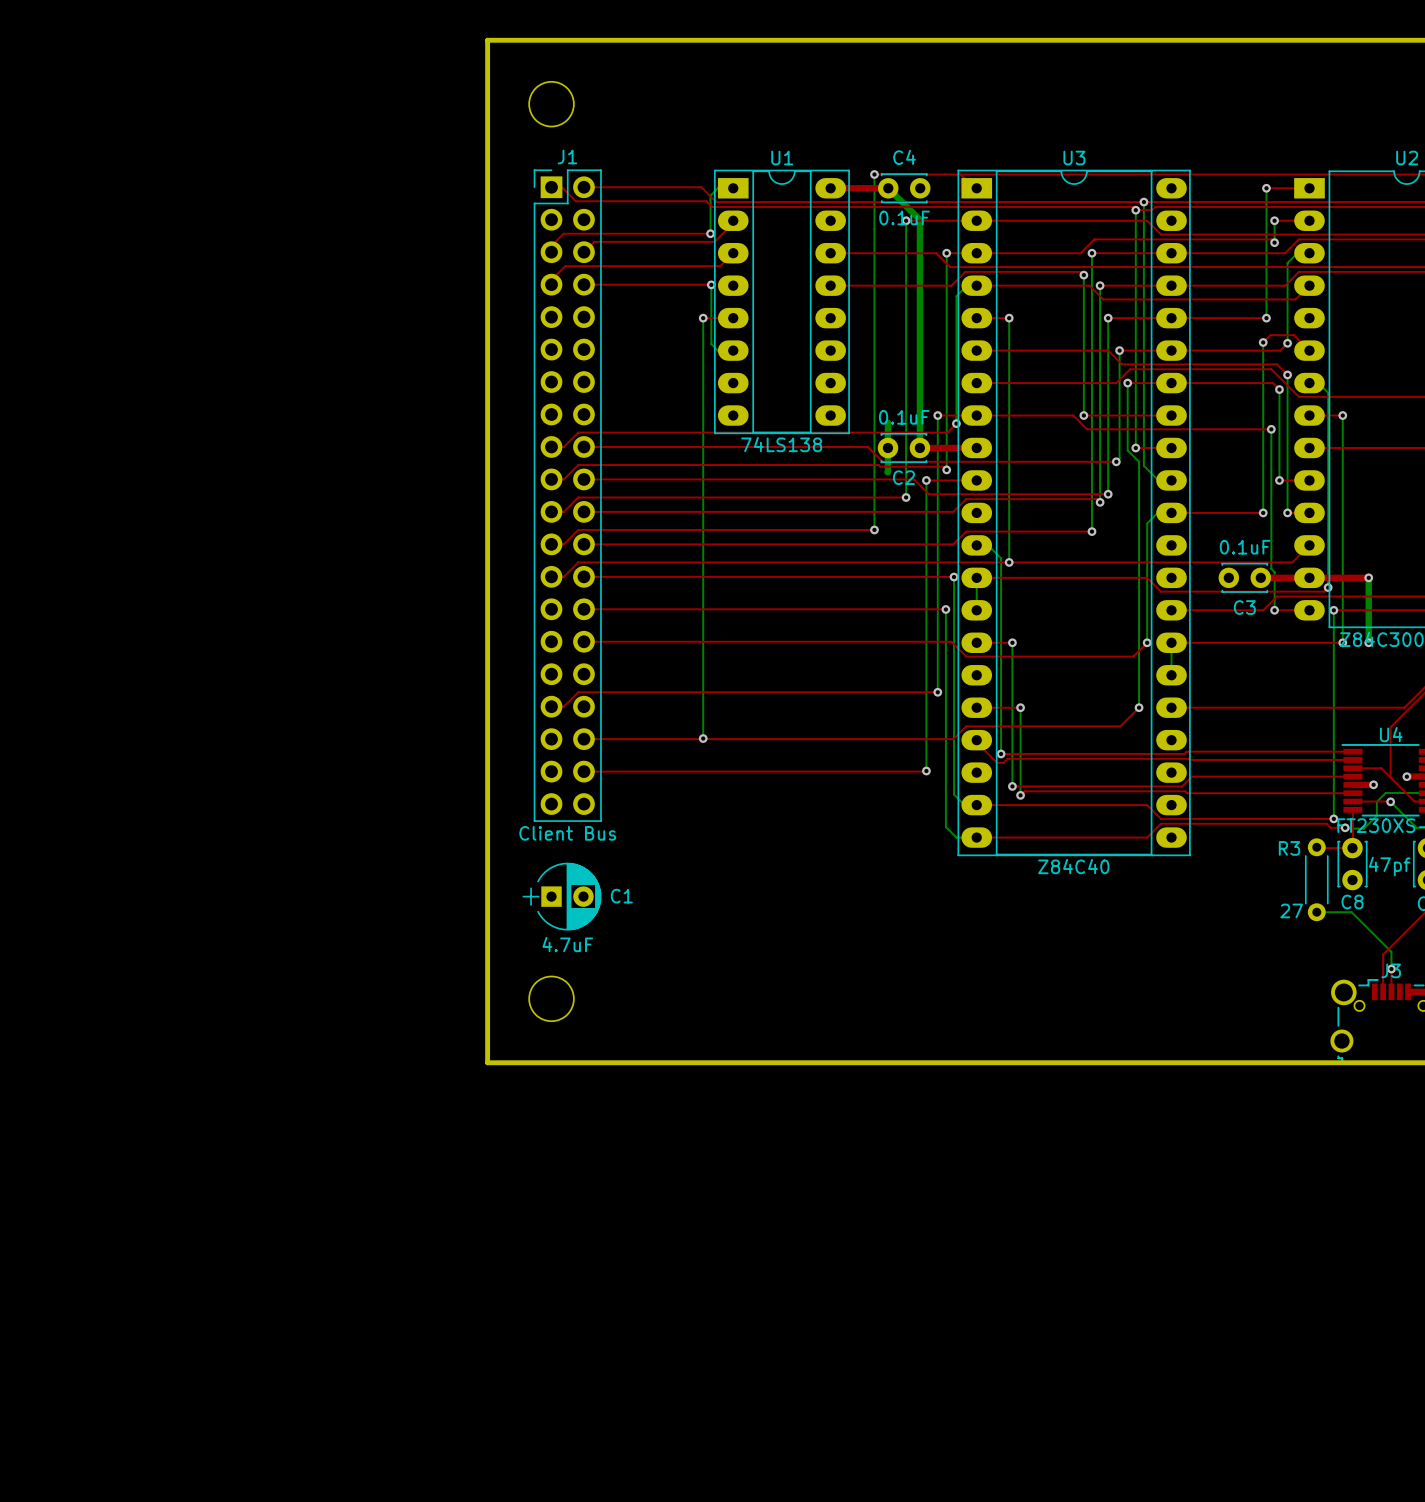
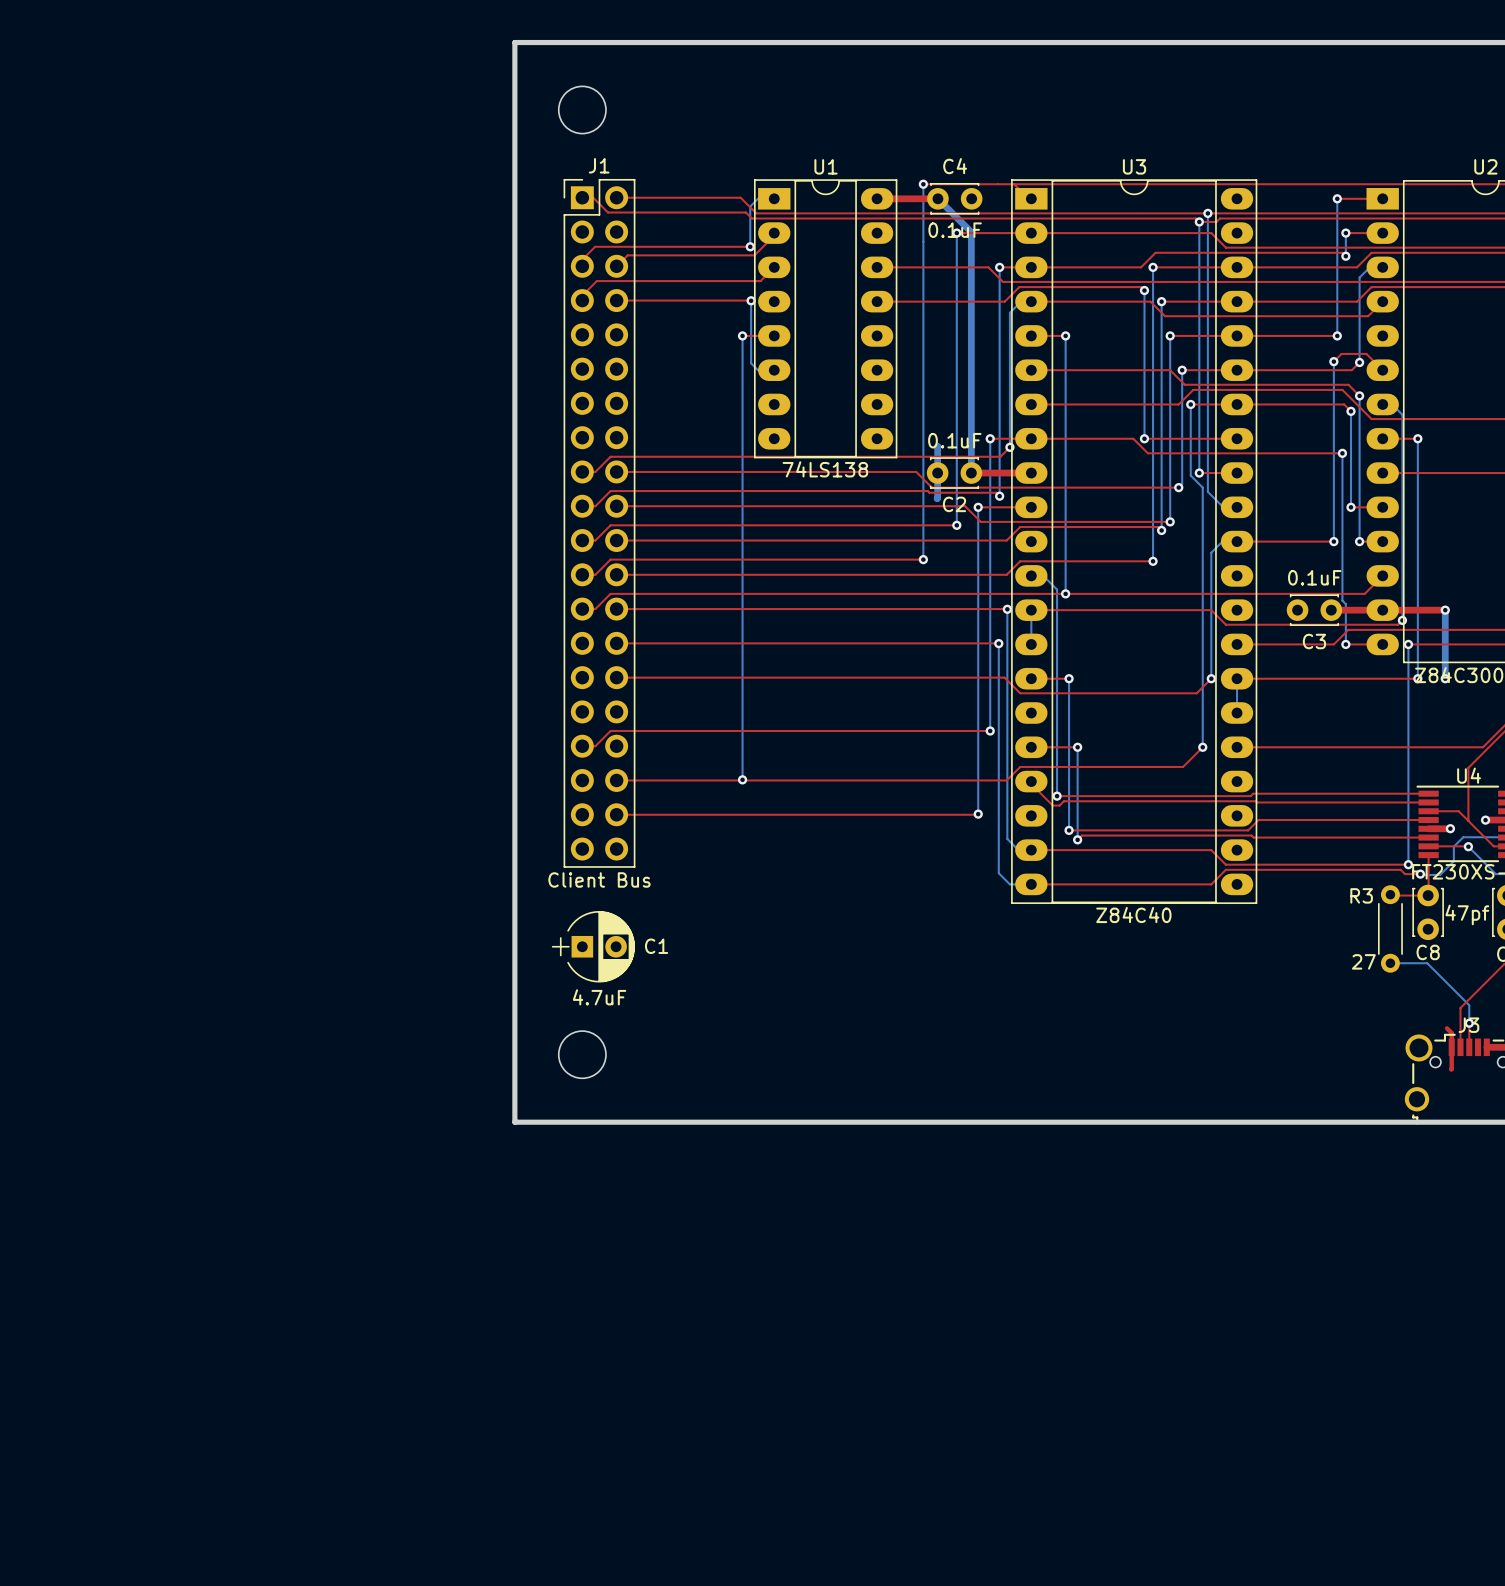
top track: none -> (1446, 1028) (1451, 1033) (1451, 1069)

